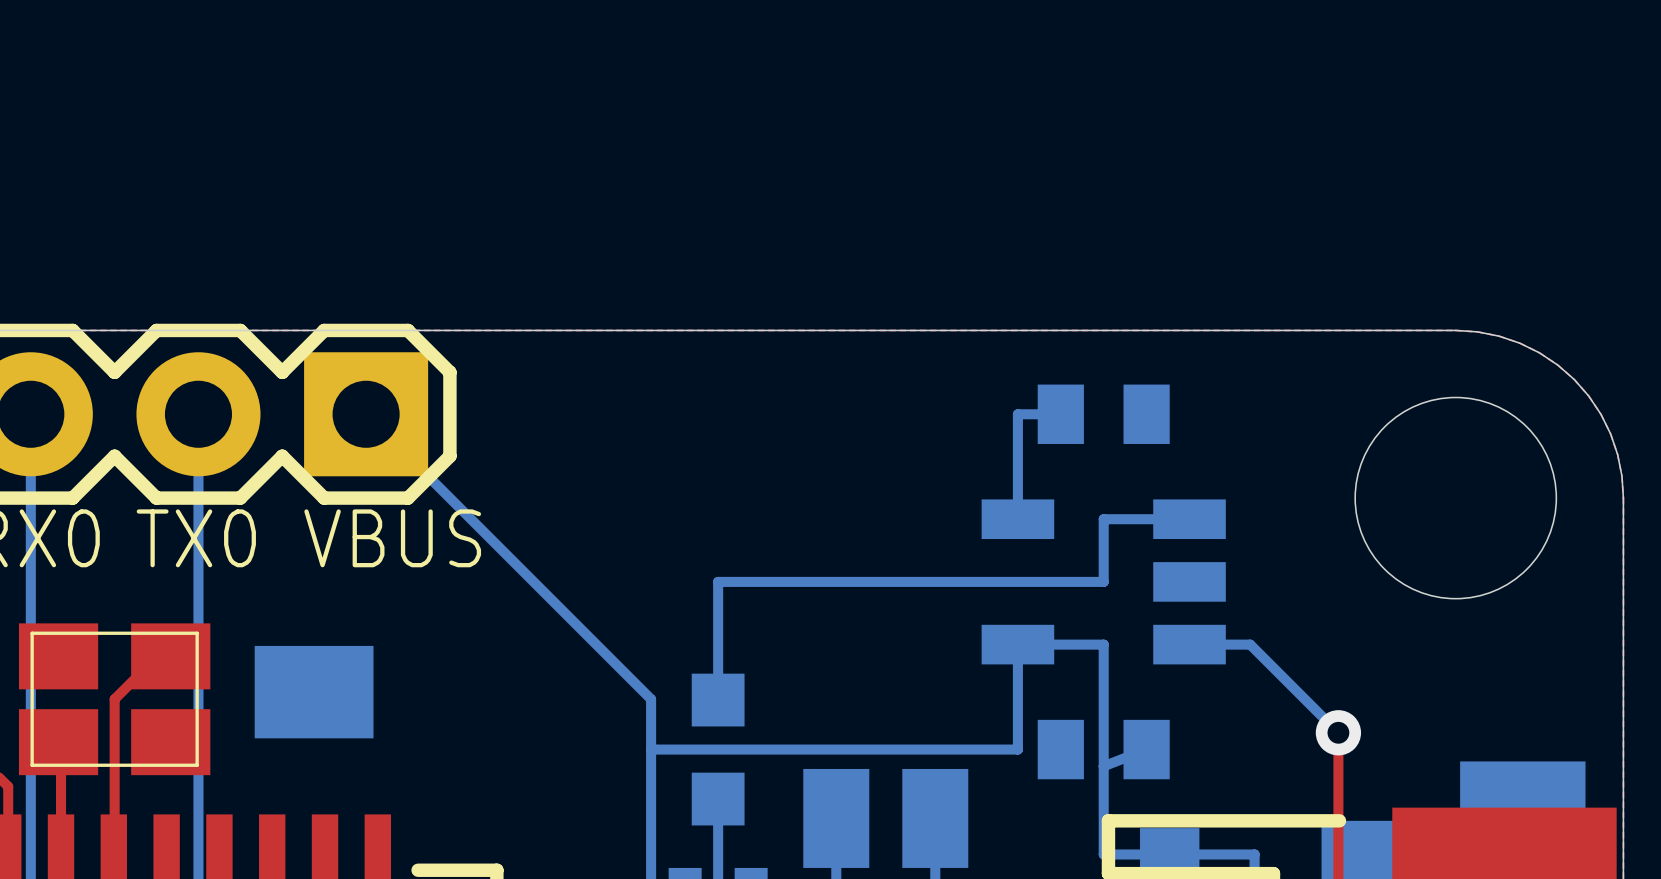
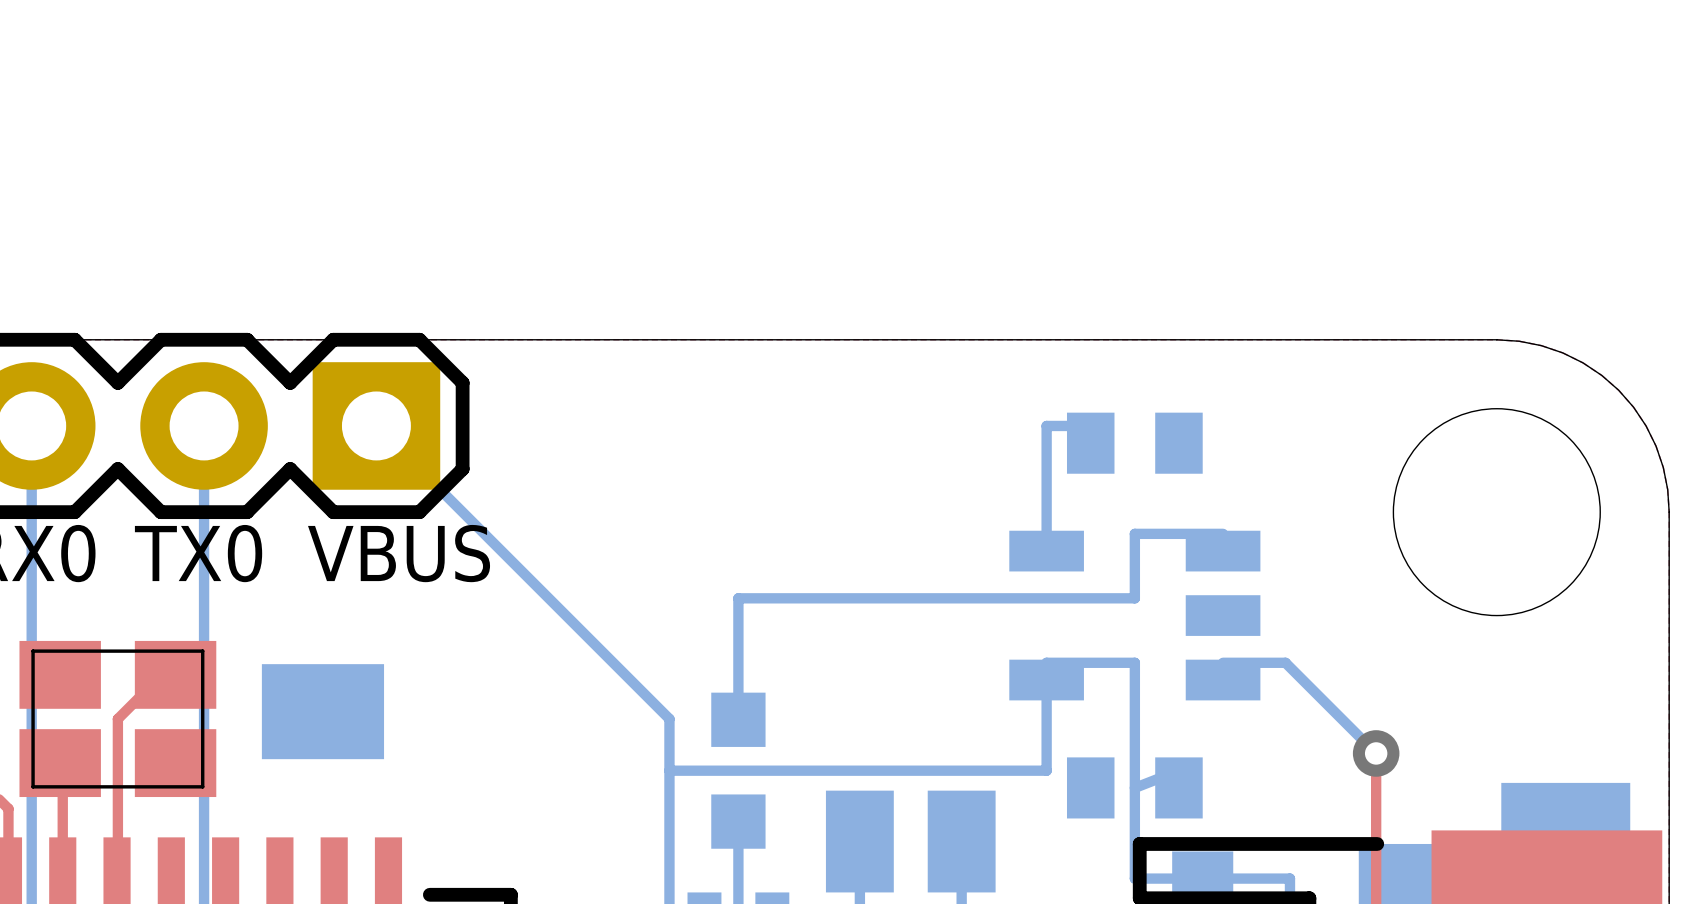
part position: (1103, 414) -> (1134, 443)
part position: (1103, 581) -> (1134, 615)
part position: (1103, 749) -> (1134, 787)

